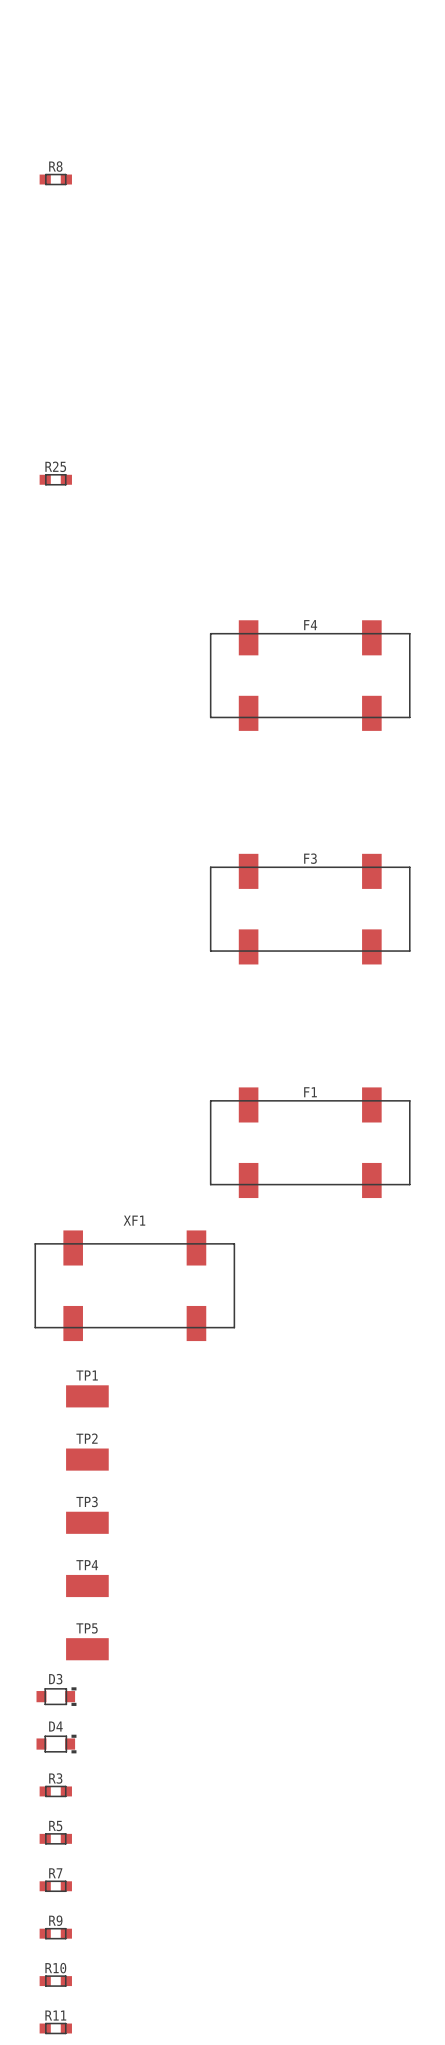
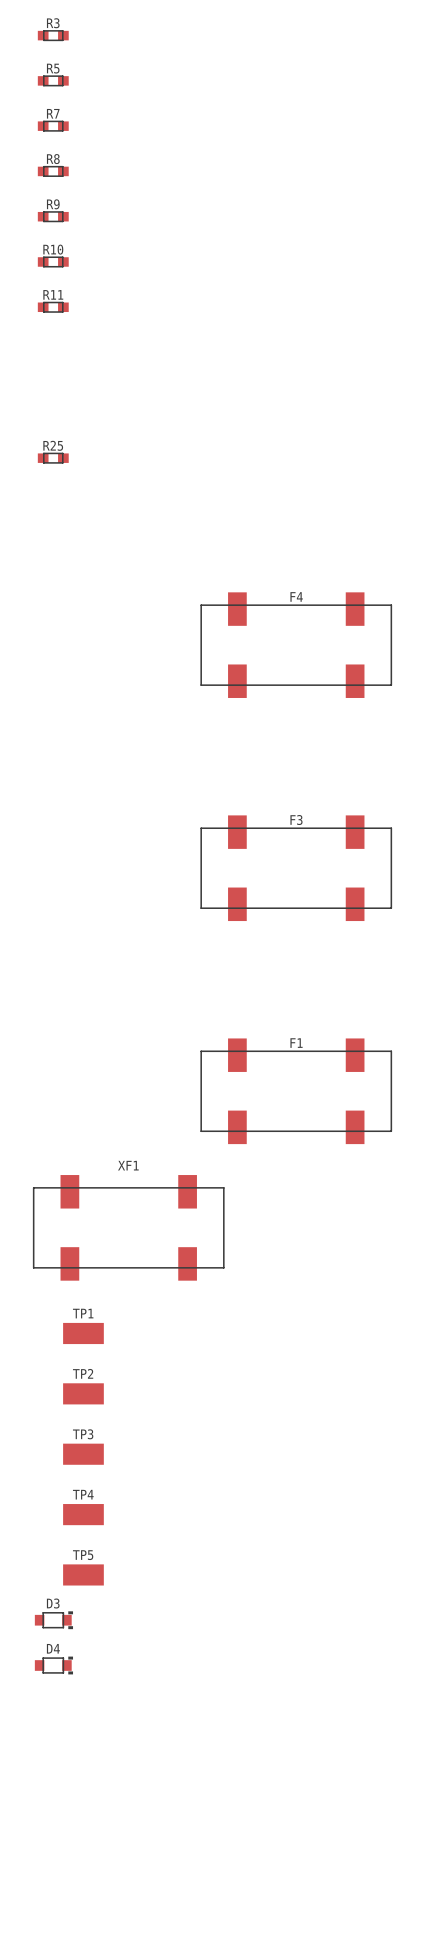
R3 position: (55, 1791) -> (53, 35)
R5 position: (55, 1838) -> (53, 80)
R7 position: (55, 1886) -> (53, 126)
R9 position: (55, 1933) -> (53, 216)
R10 position: (55, 1981) -> (53, 261)
R11 position: (55, 2028) -> (53, 307)

